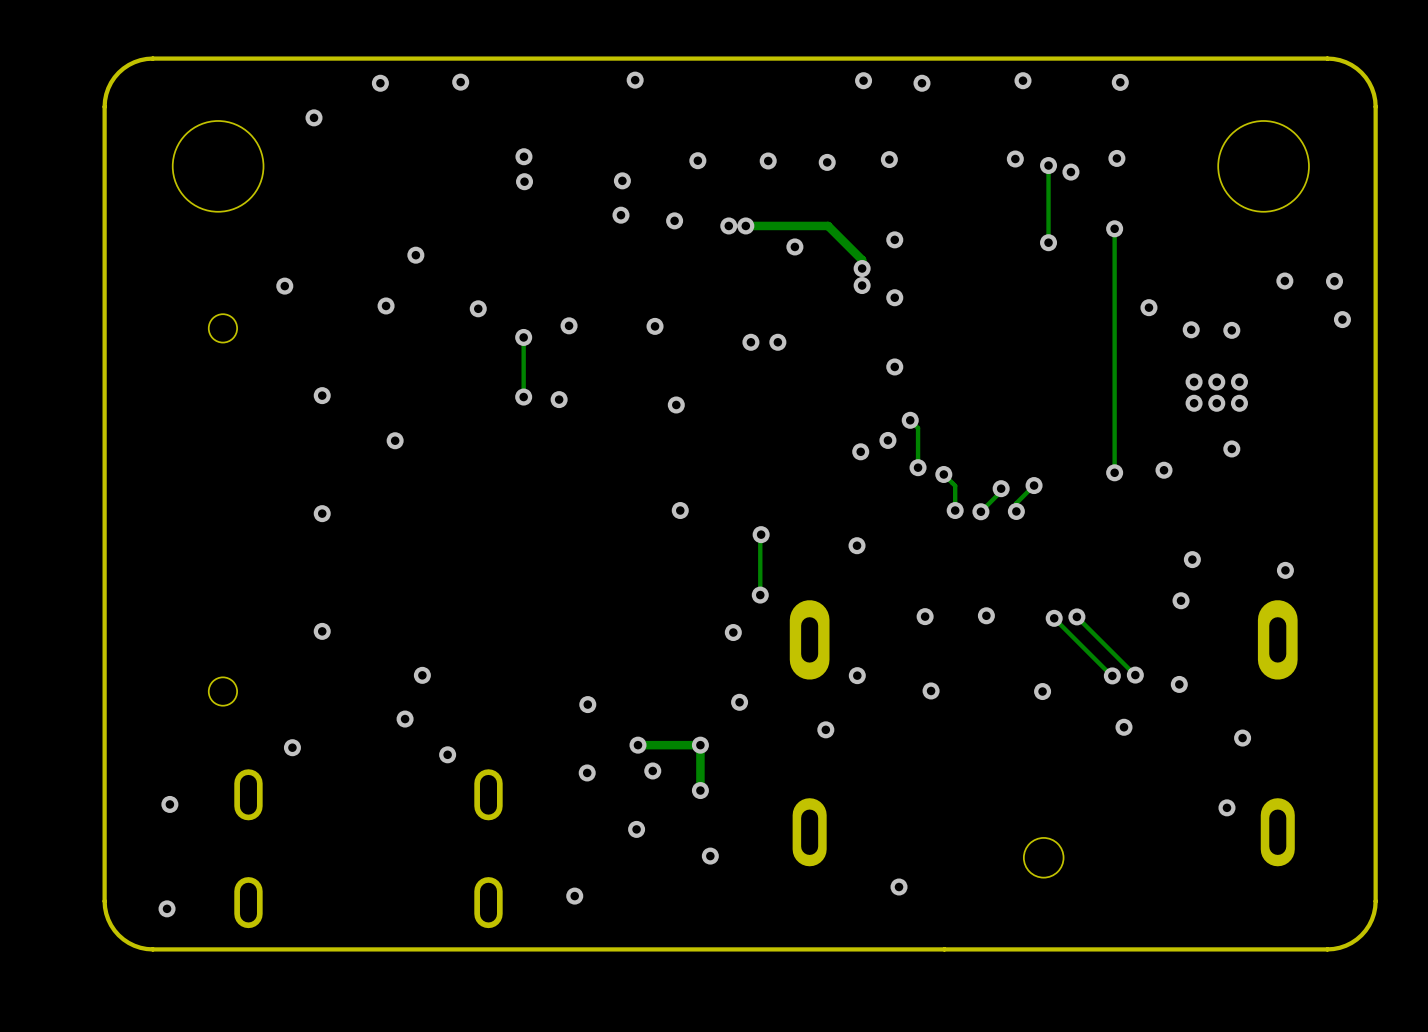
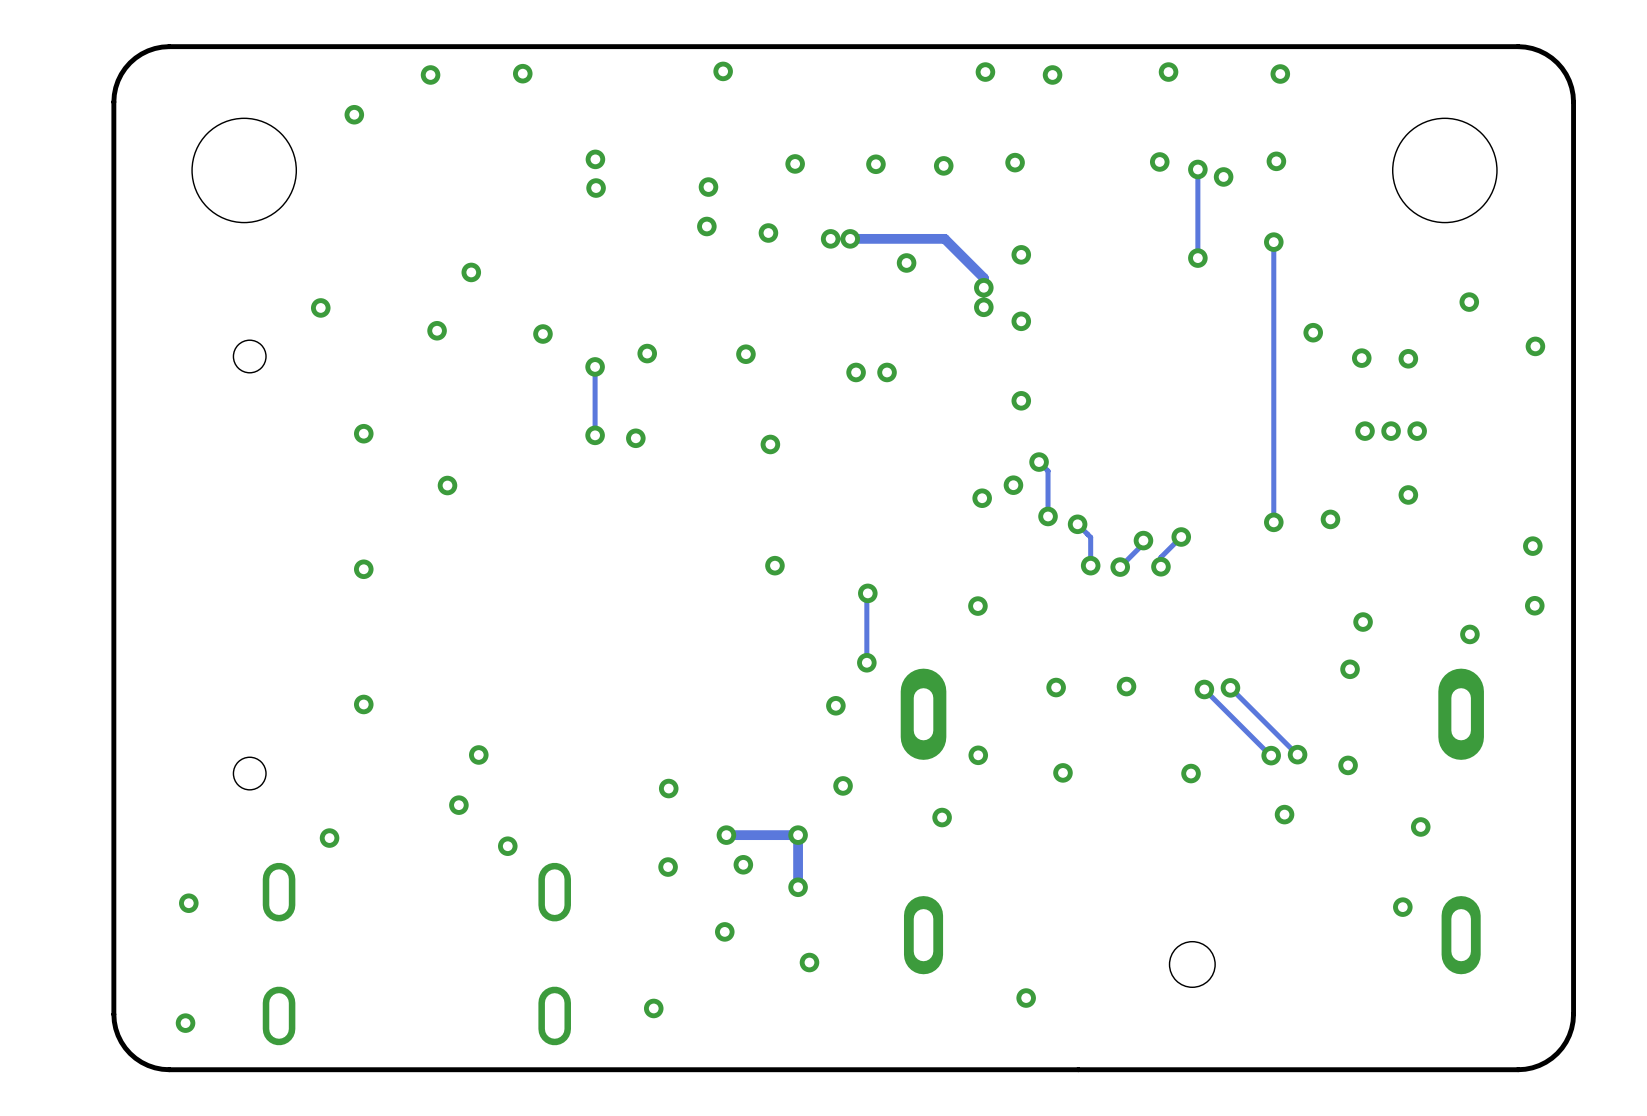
via: (1334, 281) -> none
via: (1194, 382) -> none
via: (1216, 382) -> none
via: (1239, 382) -> none
via: none -> (1365, 431)
via: none -> (1391, 431)
via: none -> (1417, 431)
via: (1194, 403) -> none
via: (1216, 403) -> none
via: (1239, 403) -> none
via: none -> (1532, 546)
via: none -> (1534, 605)

